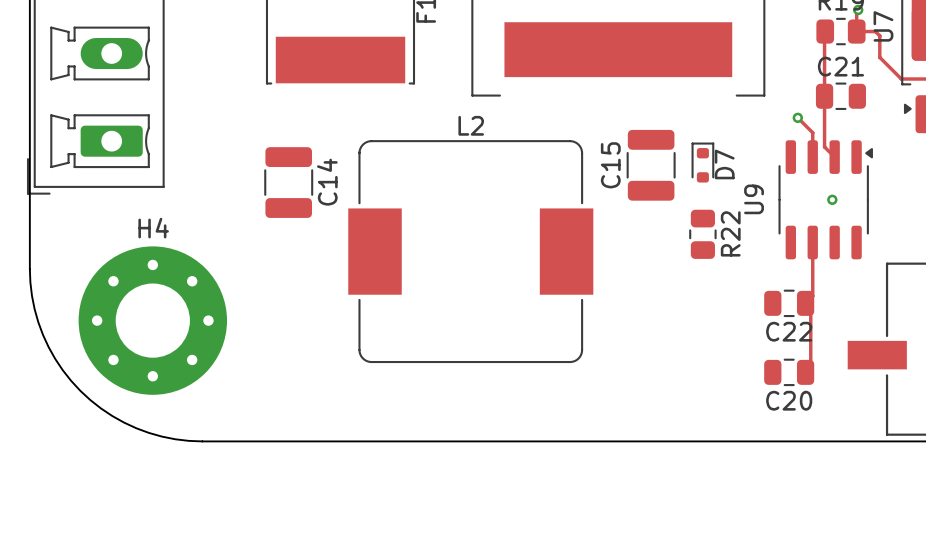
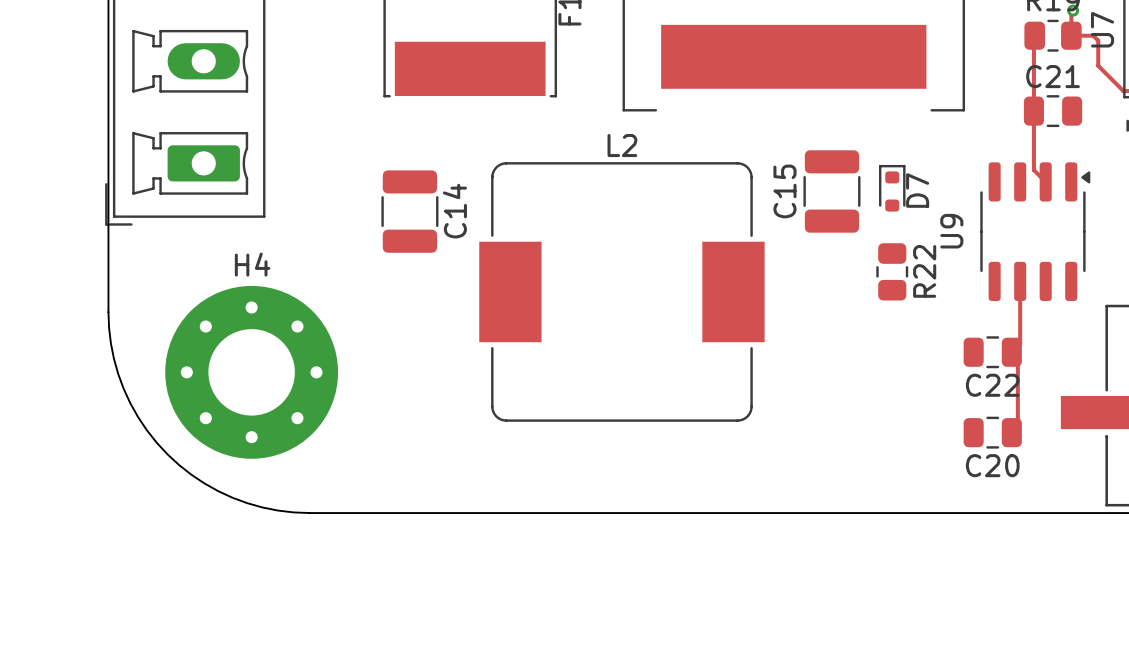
track: (797, 117) (812, 132) (812, 157) -> none
via: (797, 117) -> none
via: (832, 199) -> none

